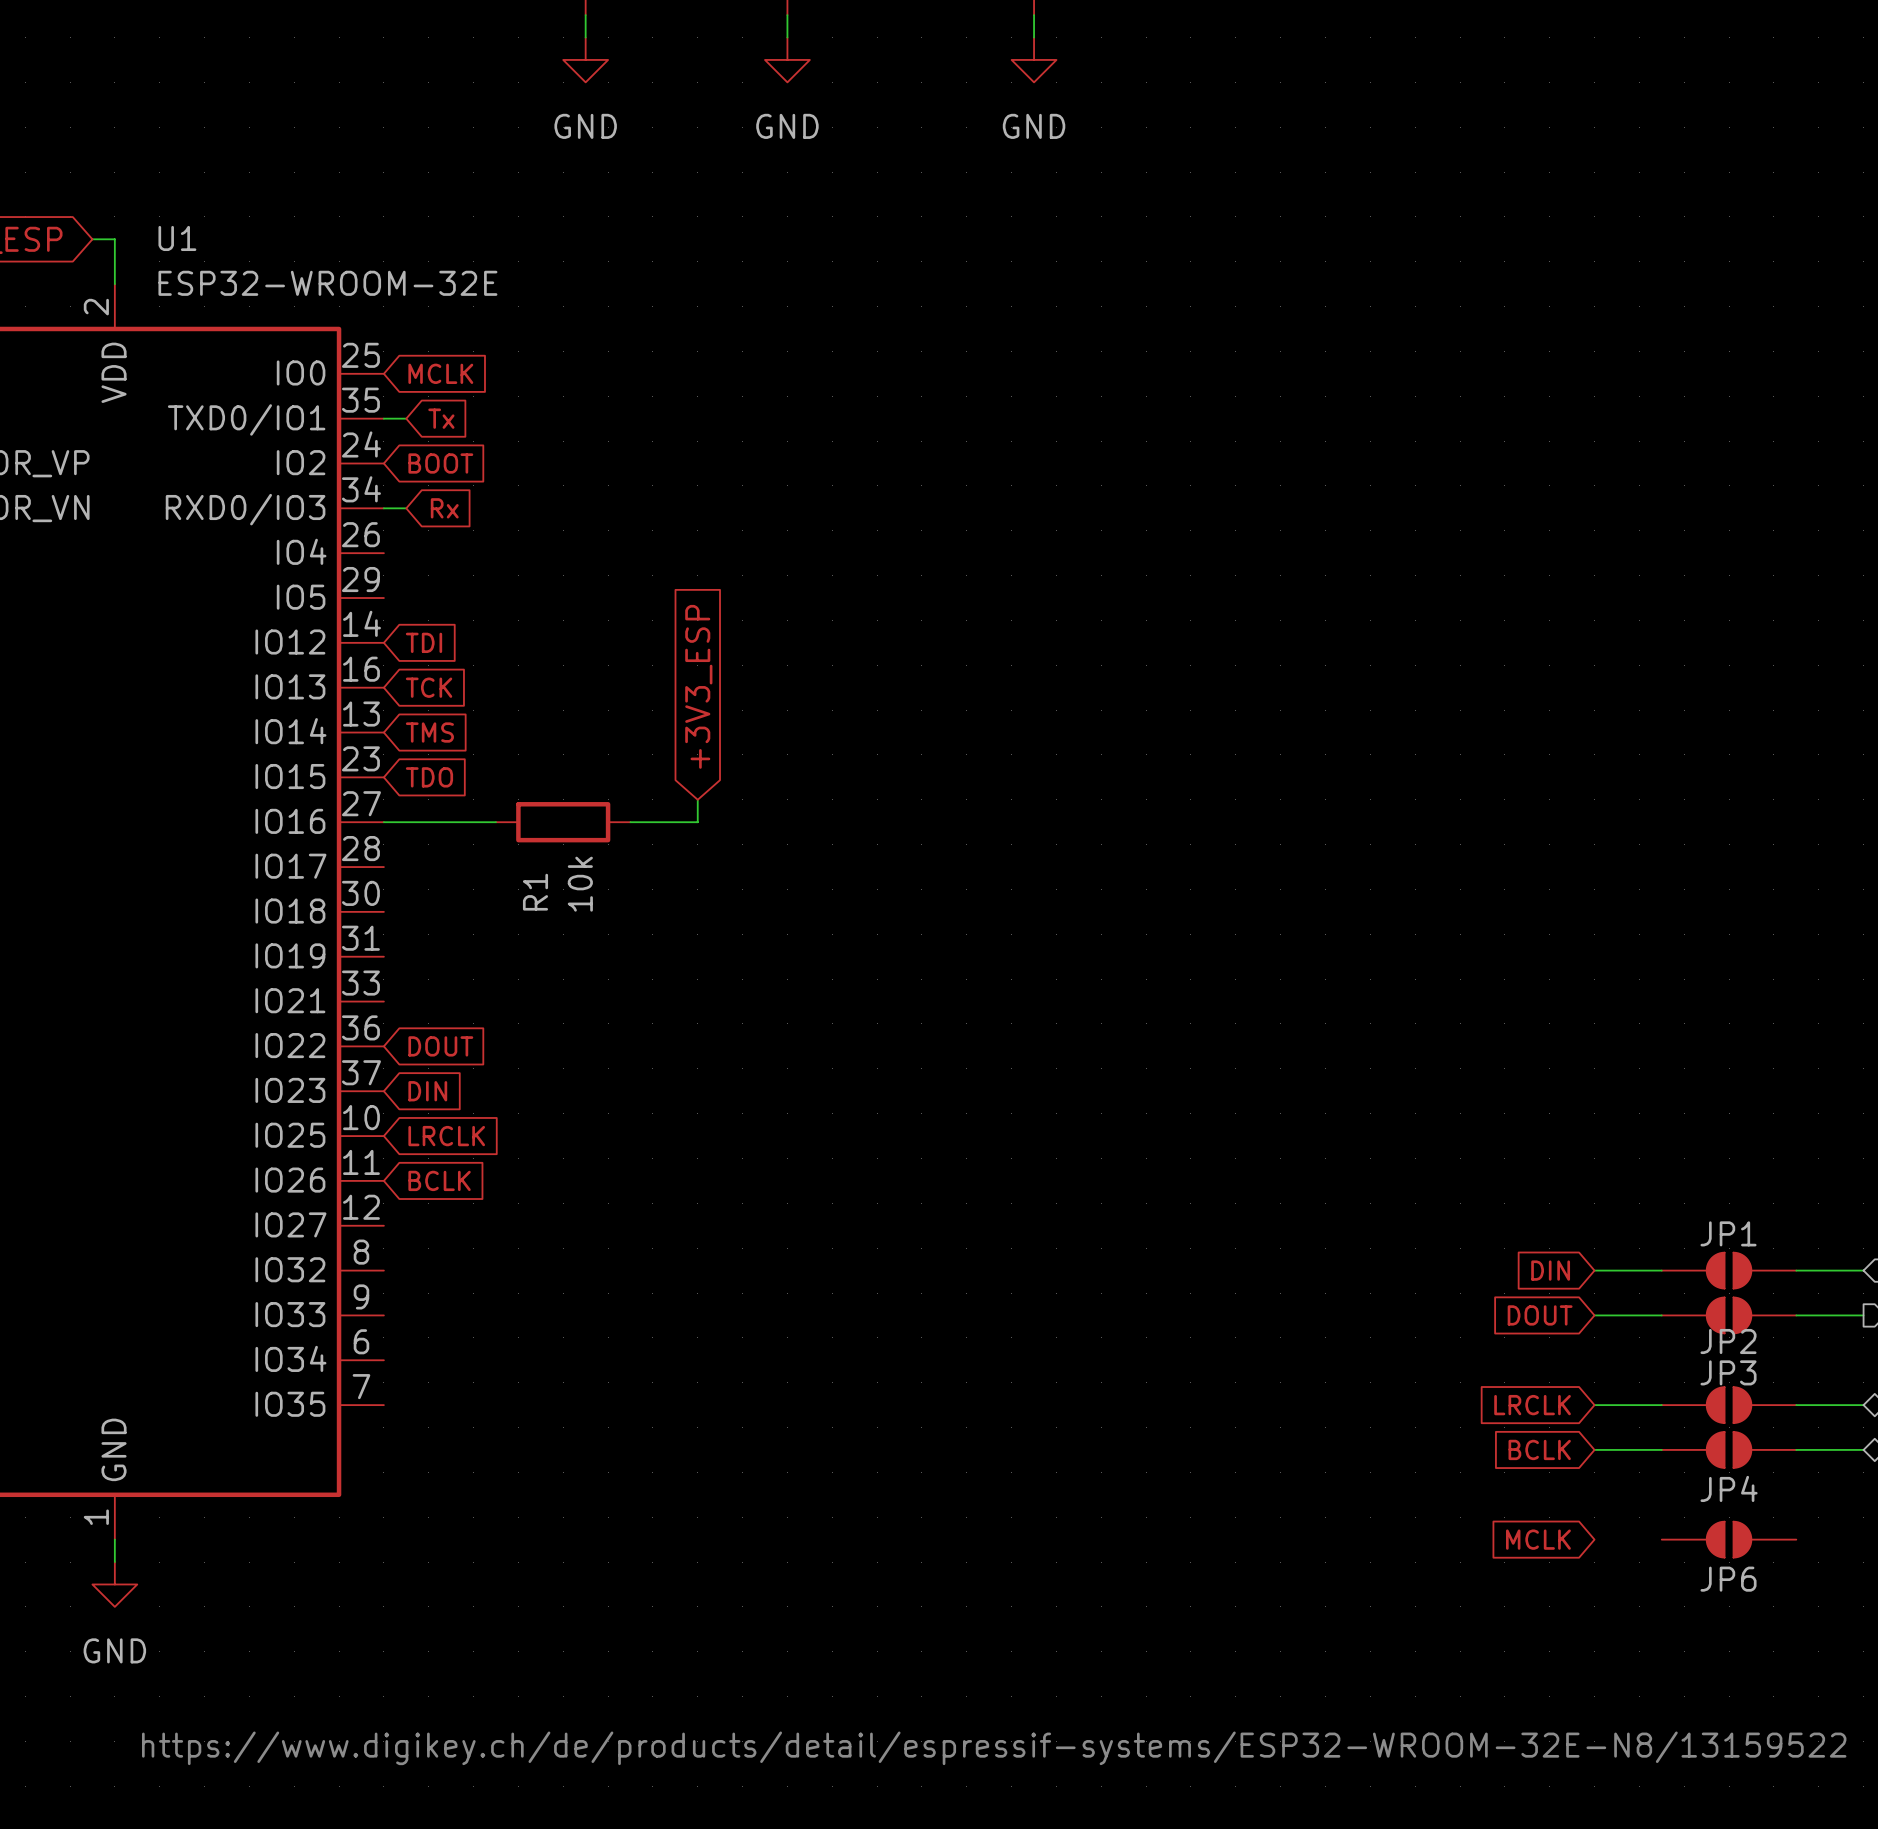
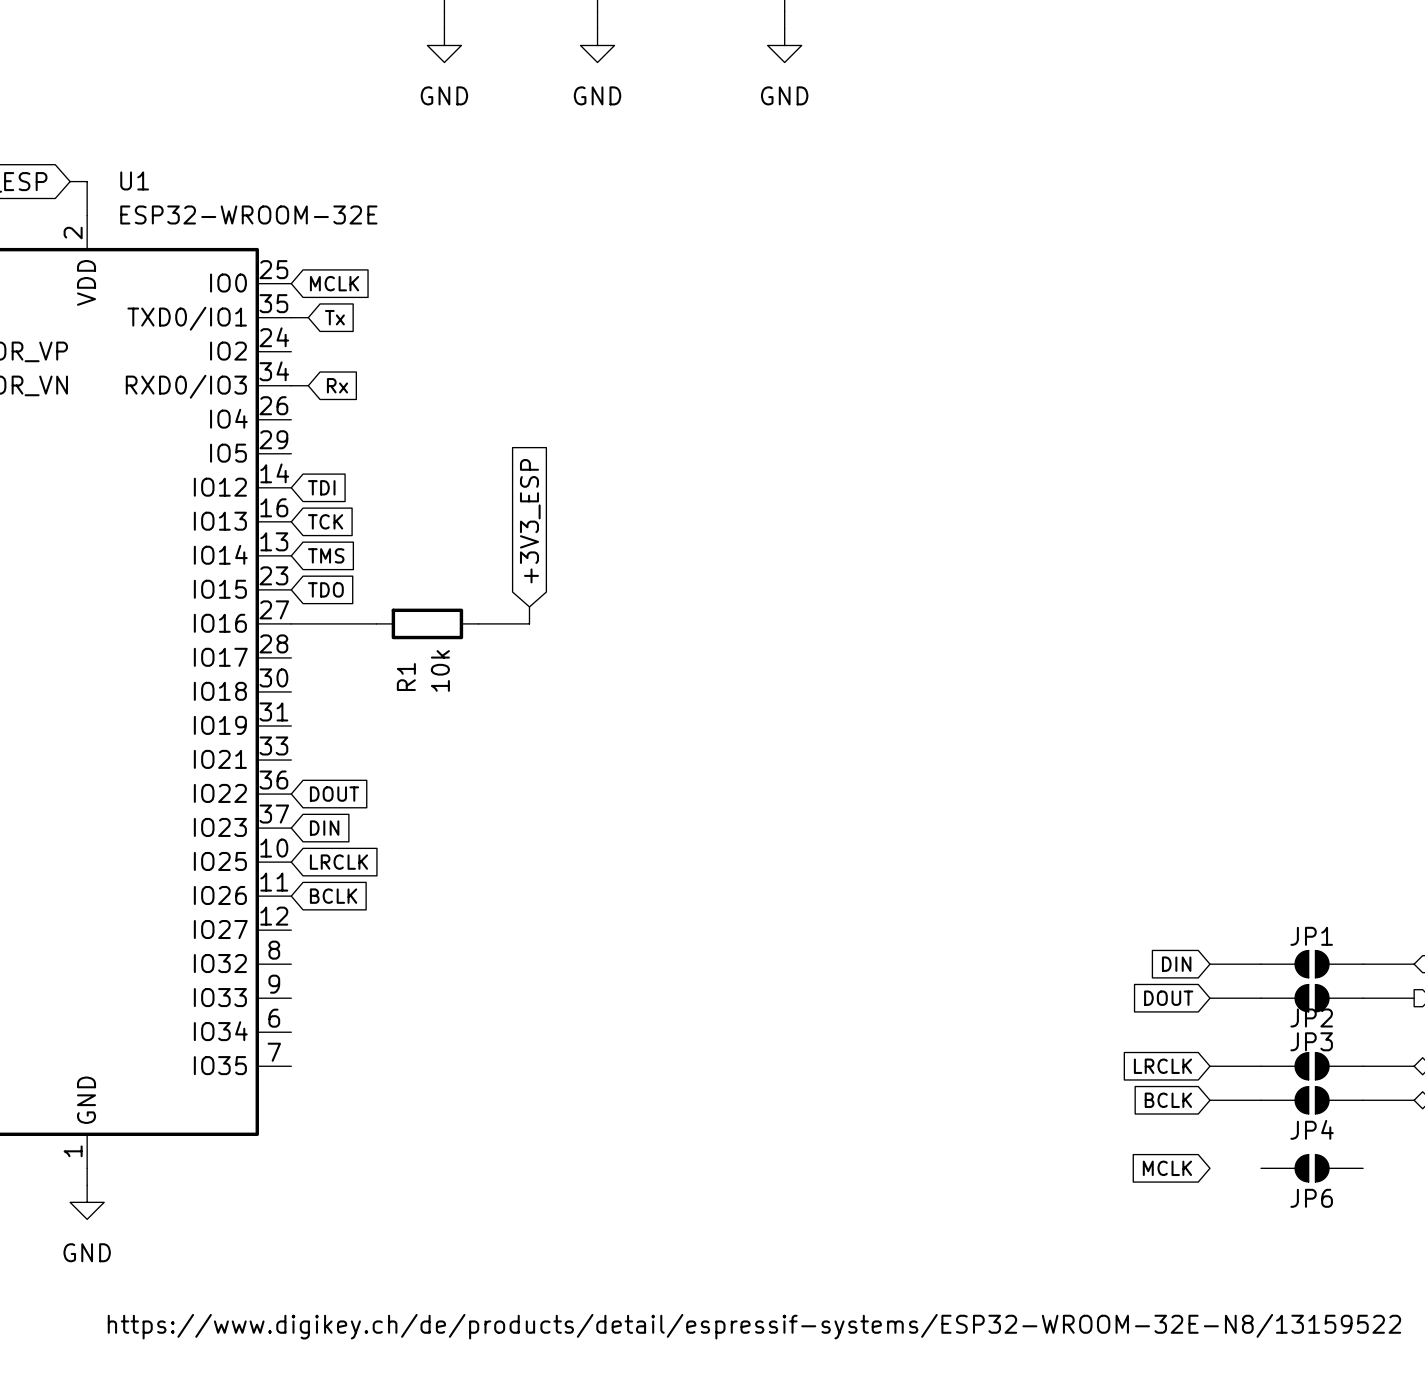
global label: BOOT (440, 463) -> none

